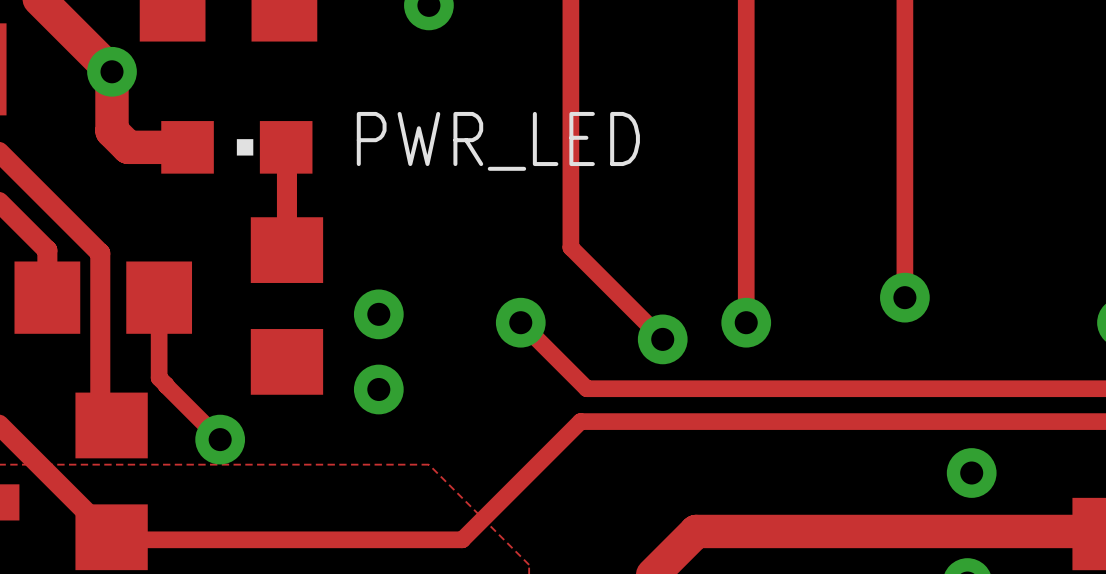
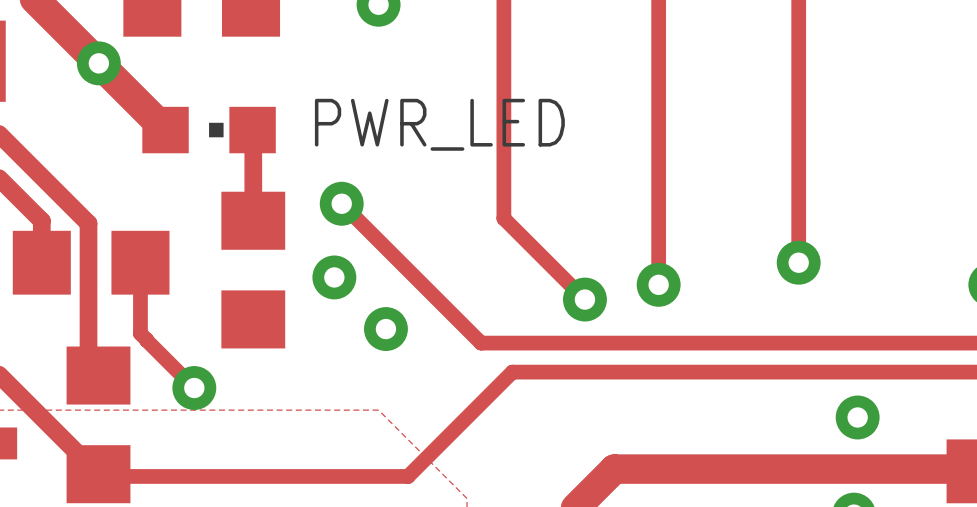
track: (112, 71) (112, 131) (128, 147) (187, 147) -> (98, 63) (165, 130)
via: none -> (341, 203)
track: (520, 322) (586, 388) -> (341, 203) (481, 343) (517, 343)
via: (520, 322) -> none
via: none -> (385, 329)
via: (378, 389) -> none

